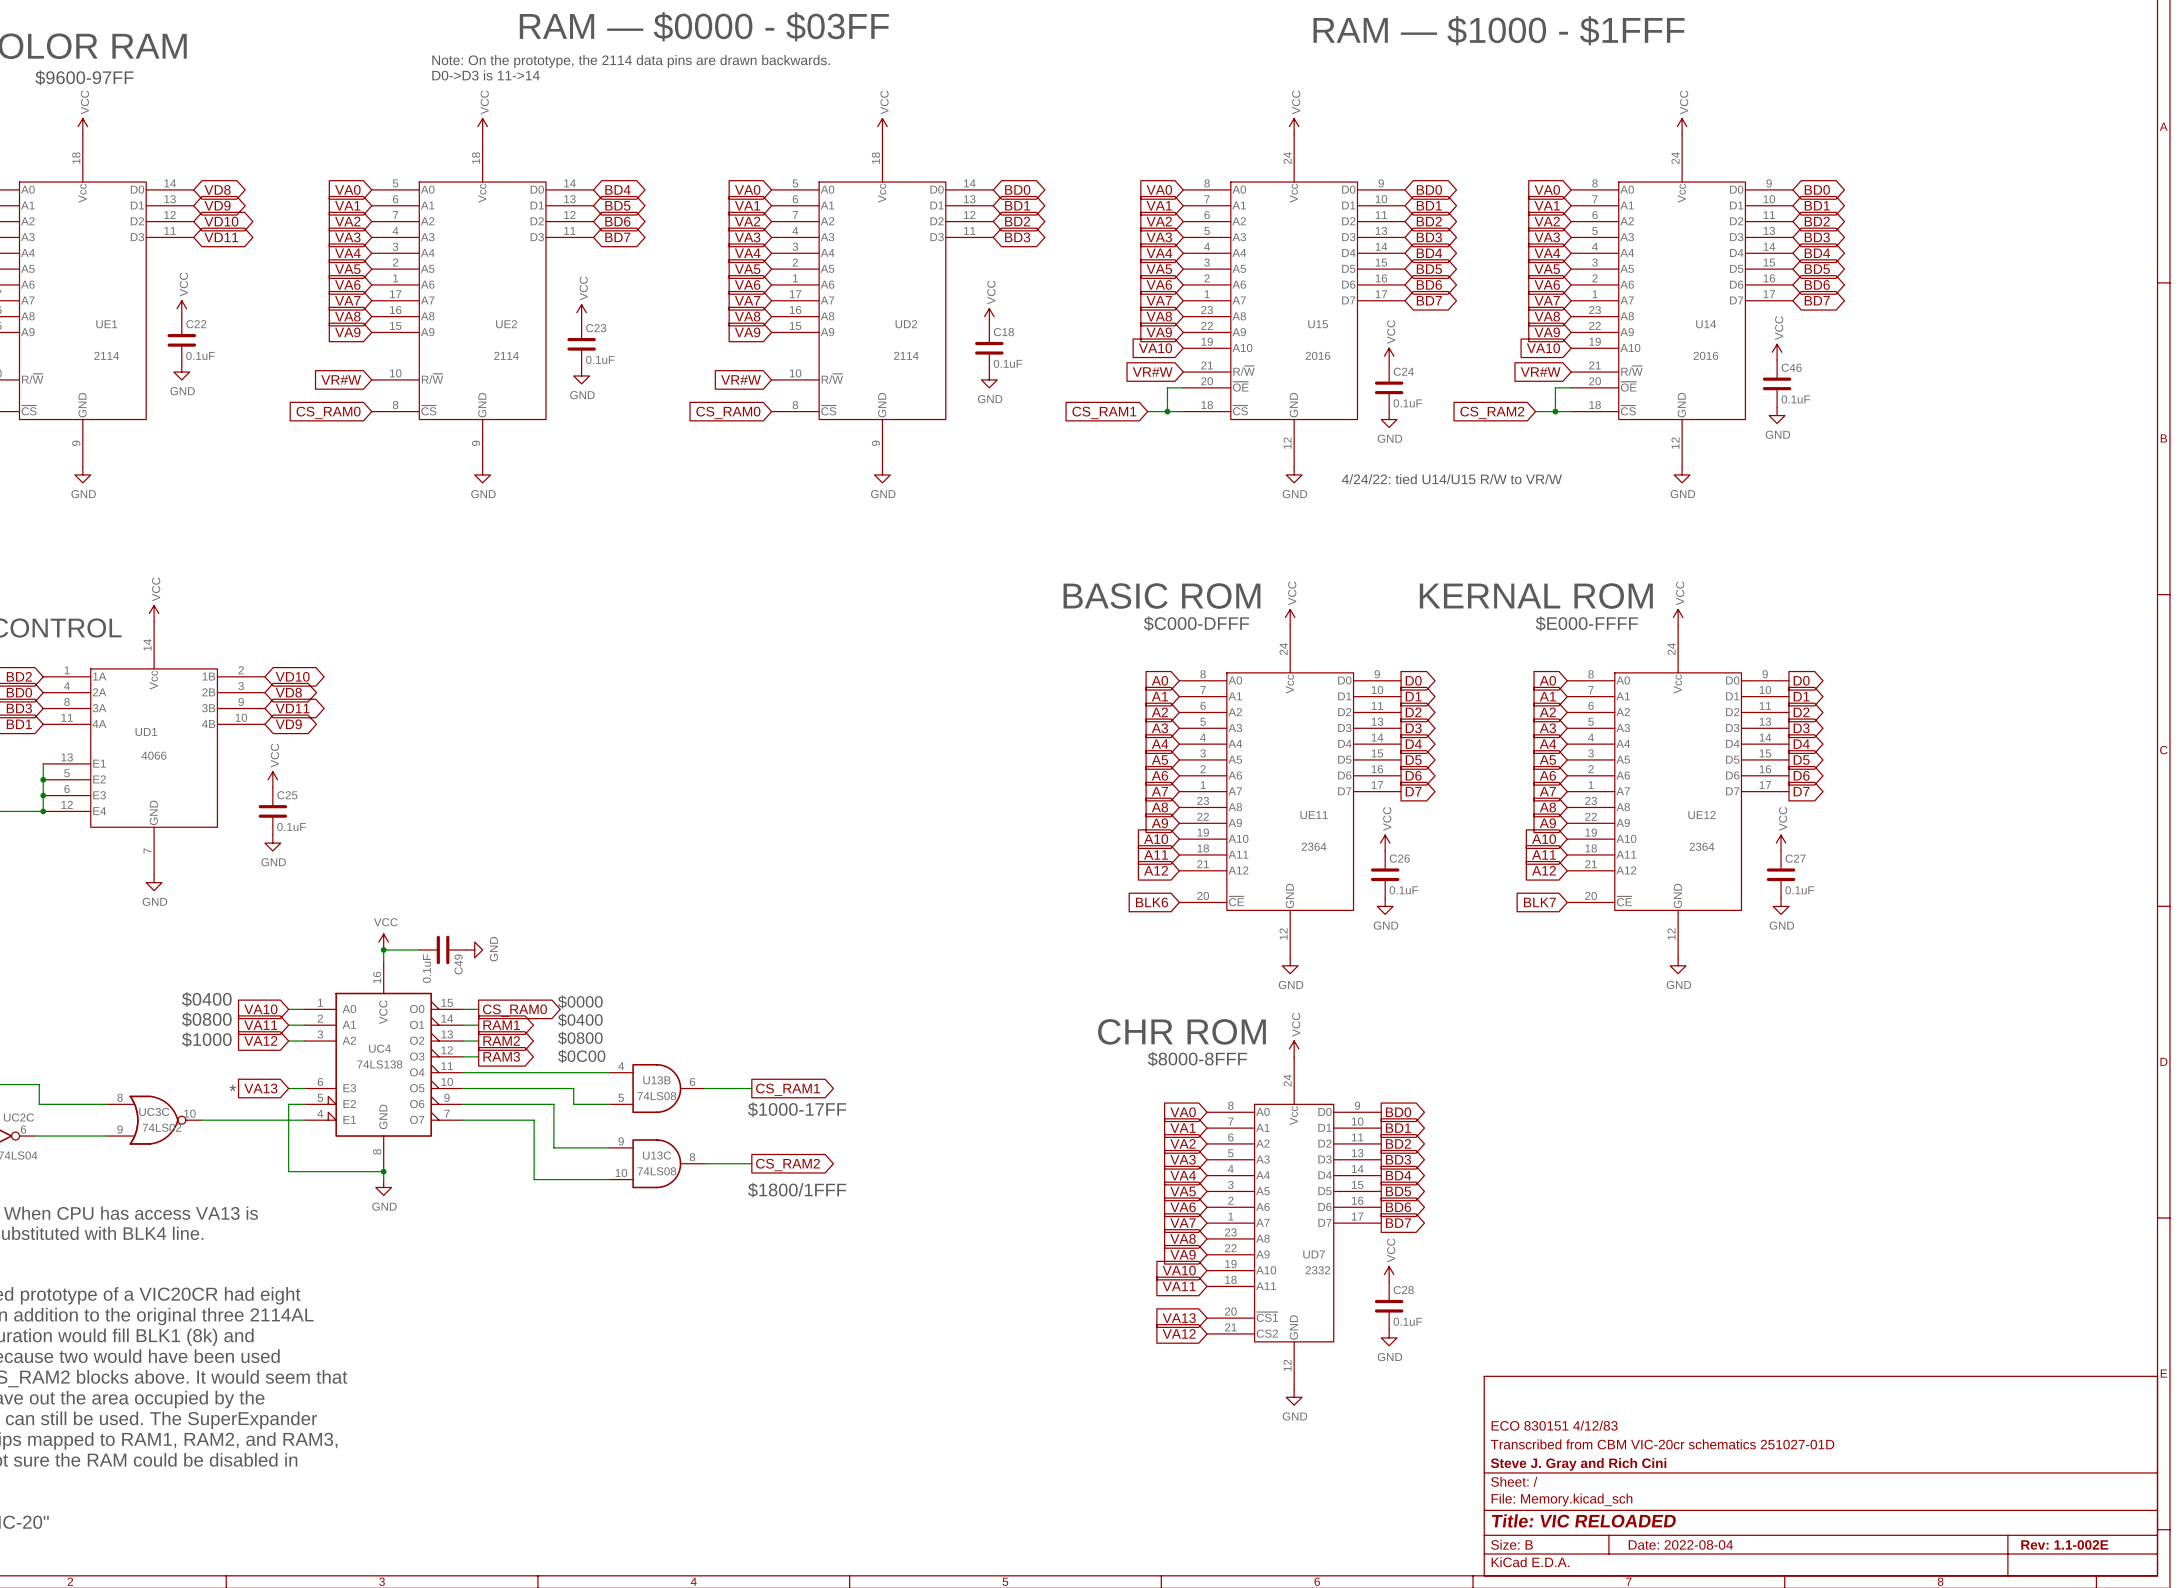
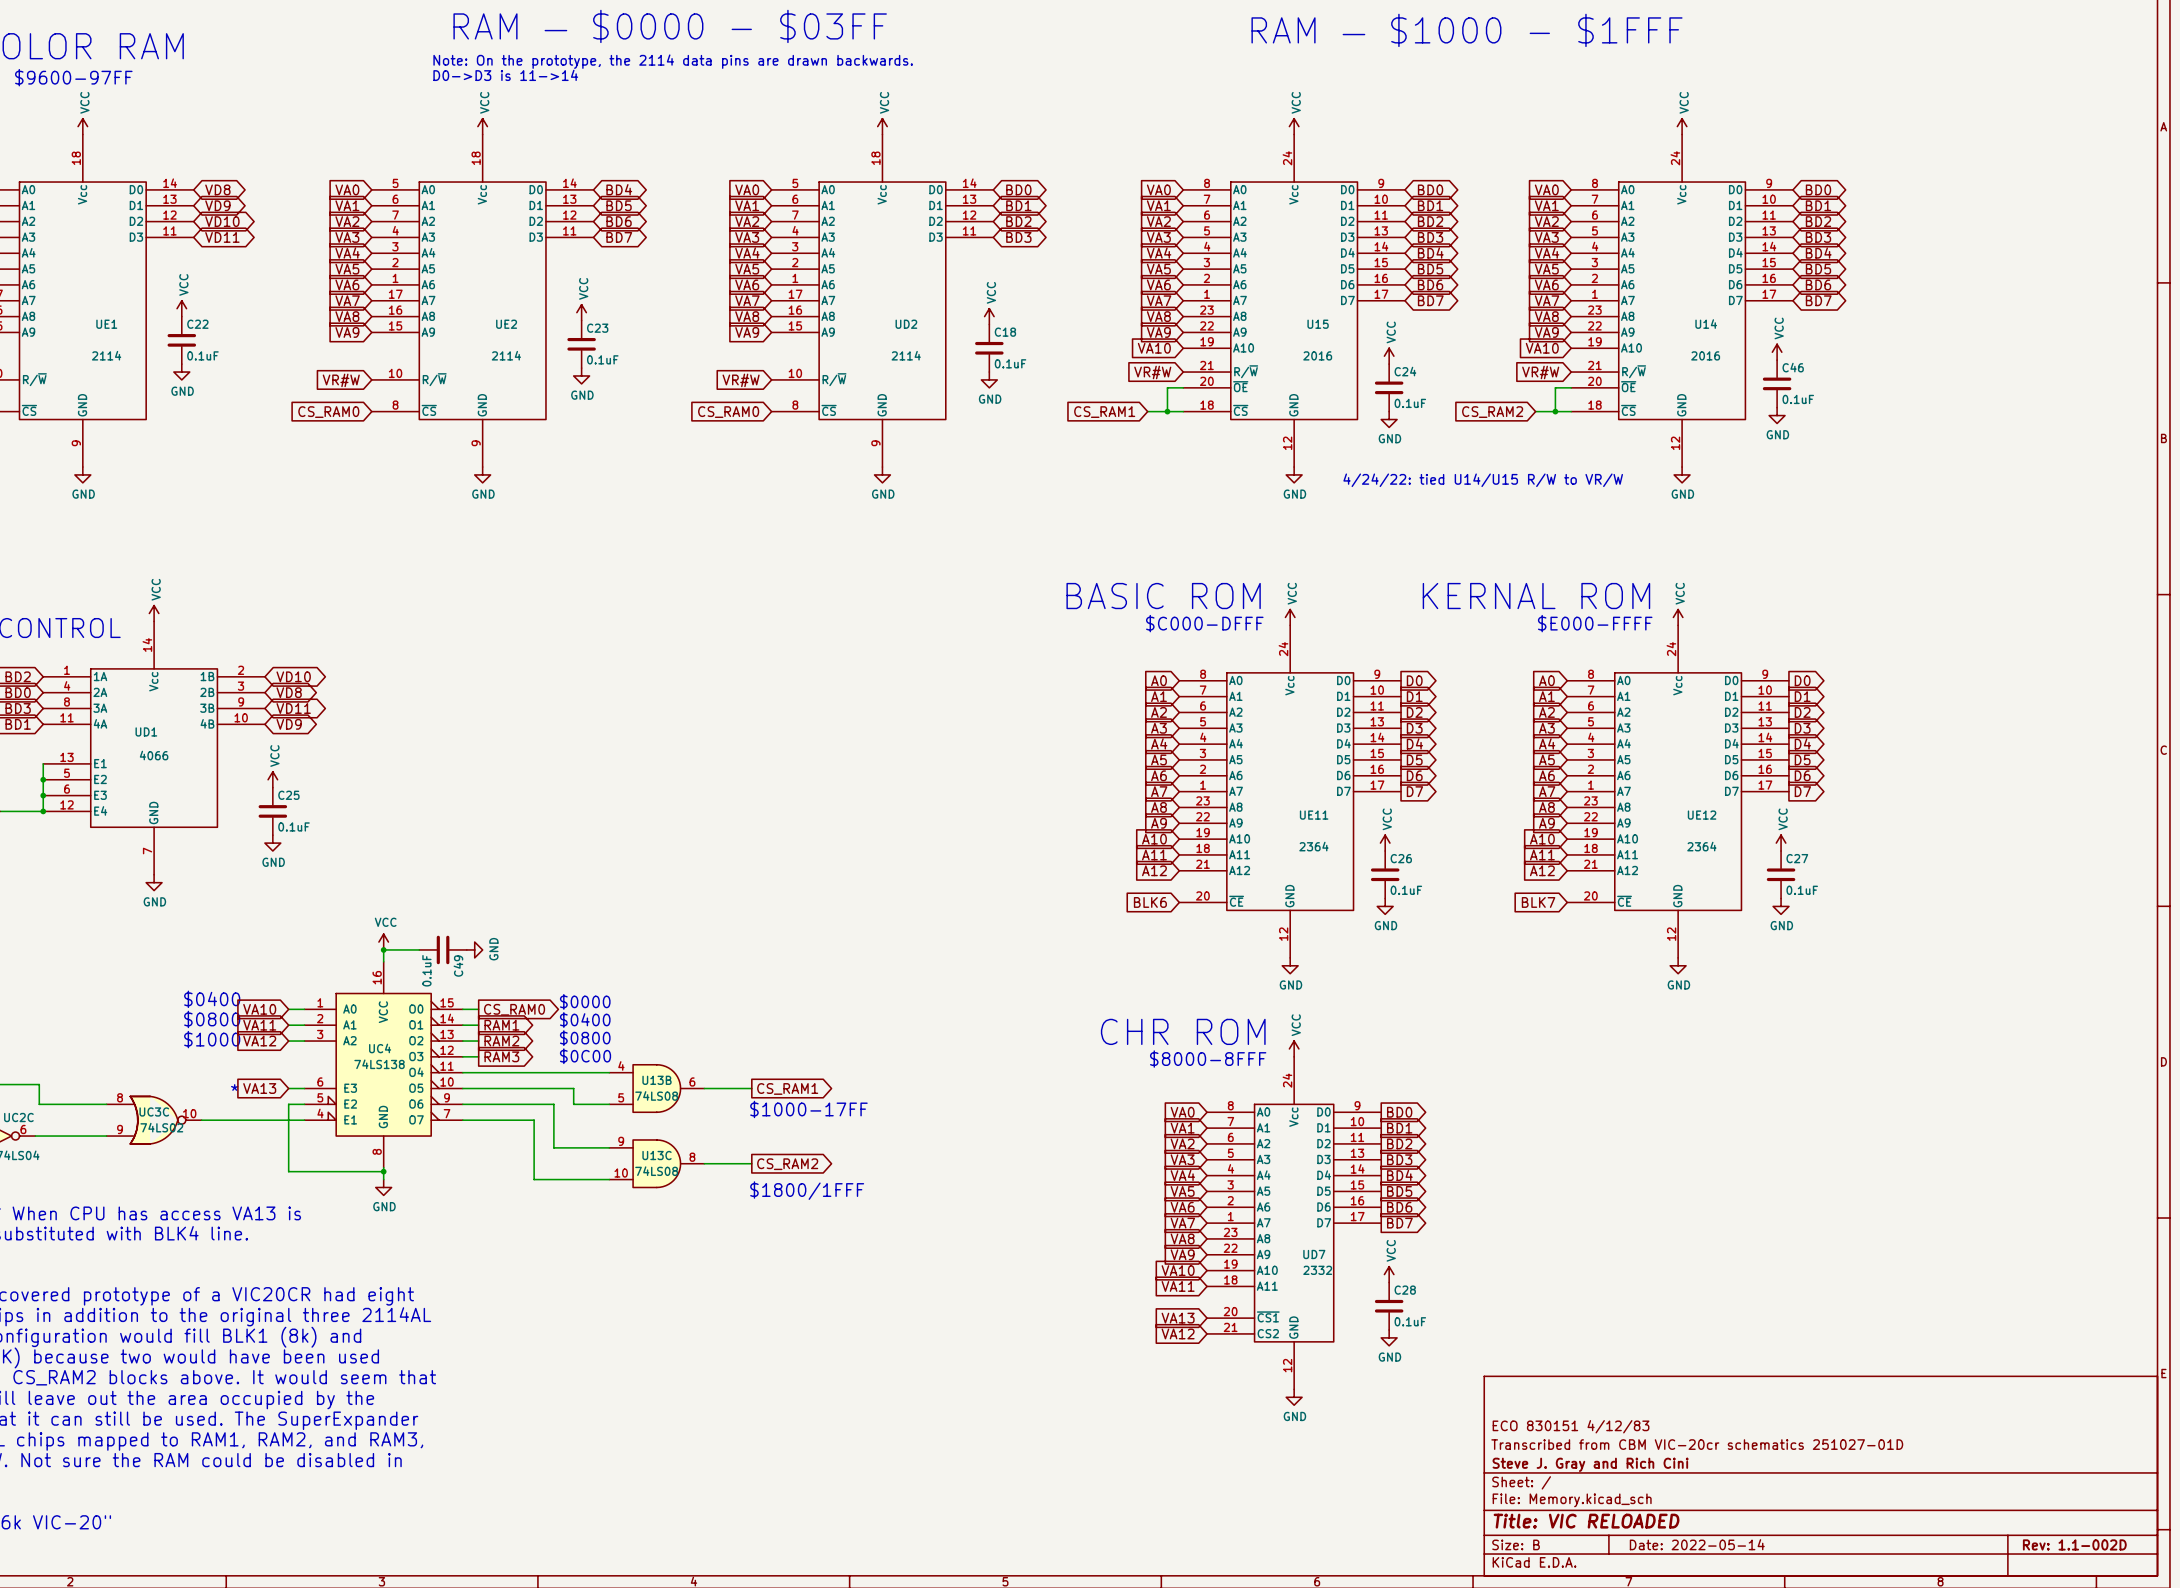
title block: Date: 2022-08-04 (1680, 1544) -> Date: 2022-05-14 (1697, 1544)
title block: Rev: 1.1-002E (2064, 1544) -> Rev: 1.1-002D (2074, 1544)

